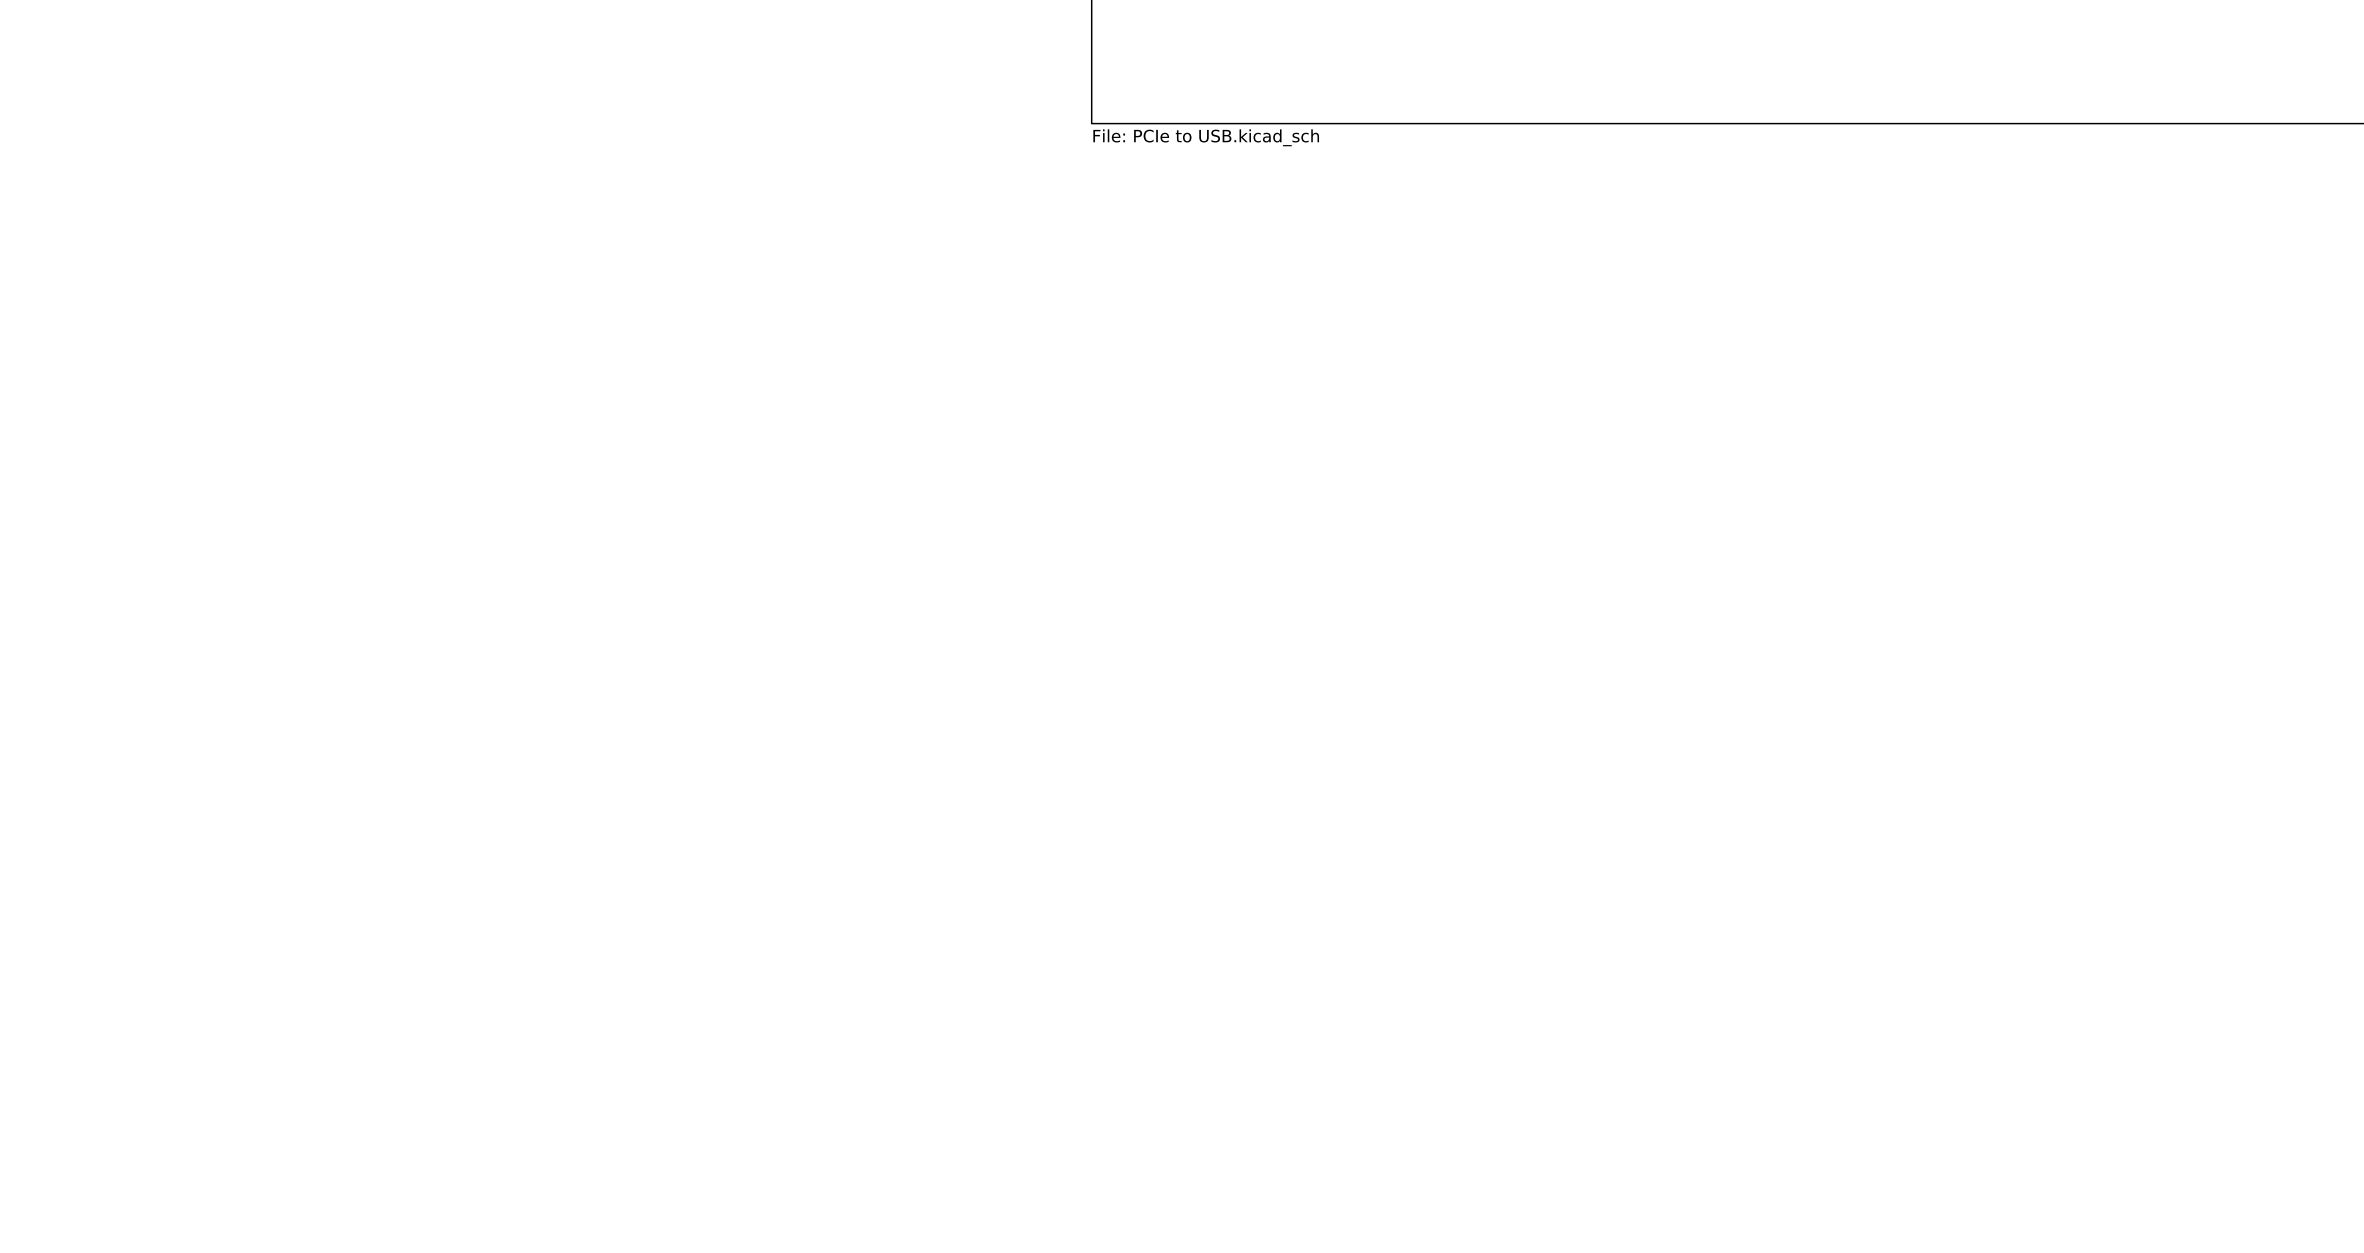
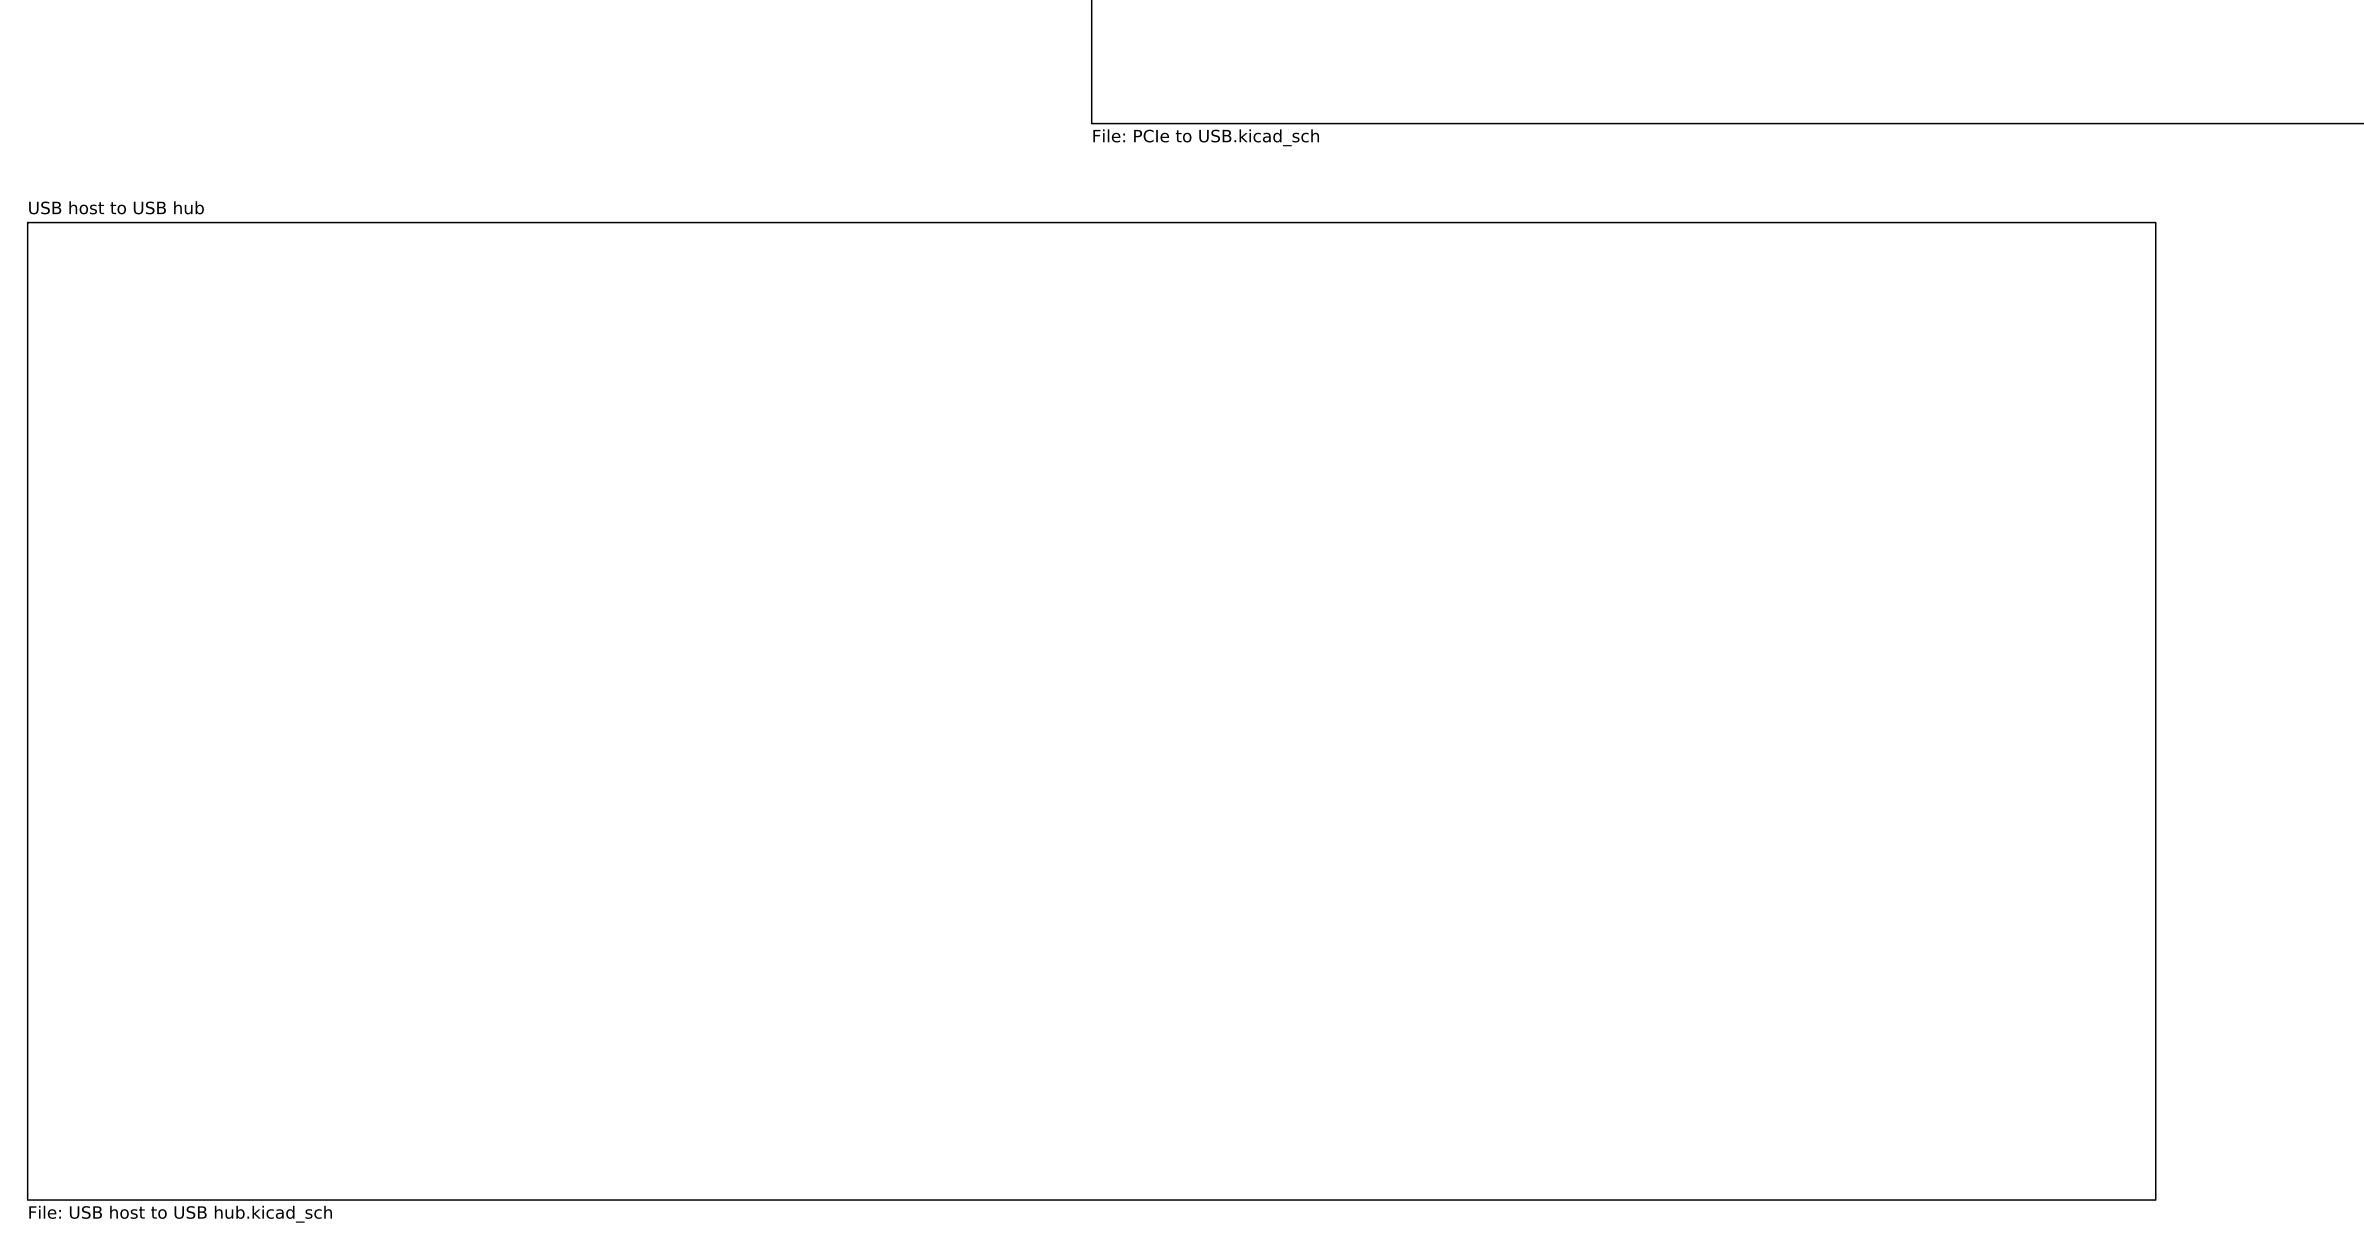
sheet USB host to USB hub: none -> File: USB host to USB hub.kicad_sch (1091, 711)

